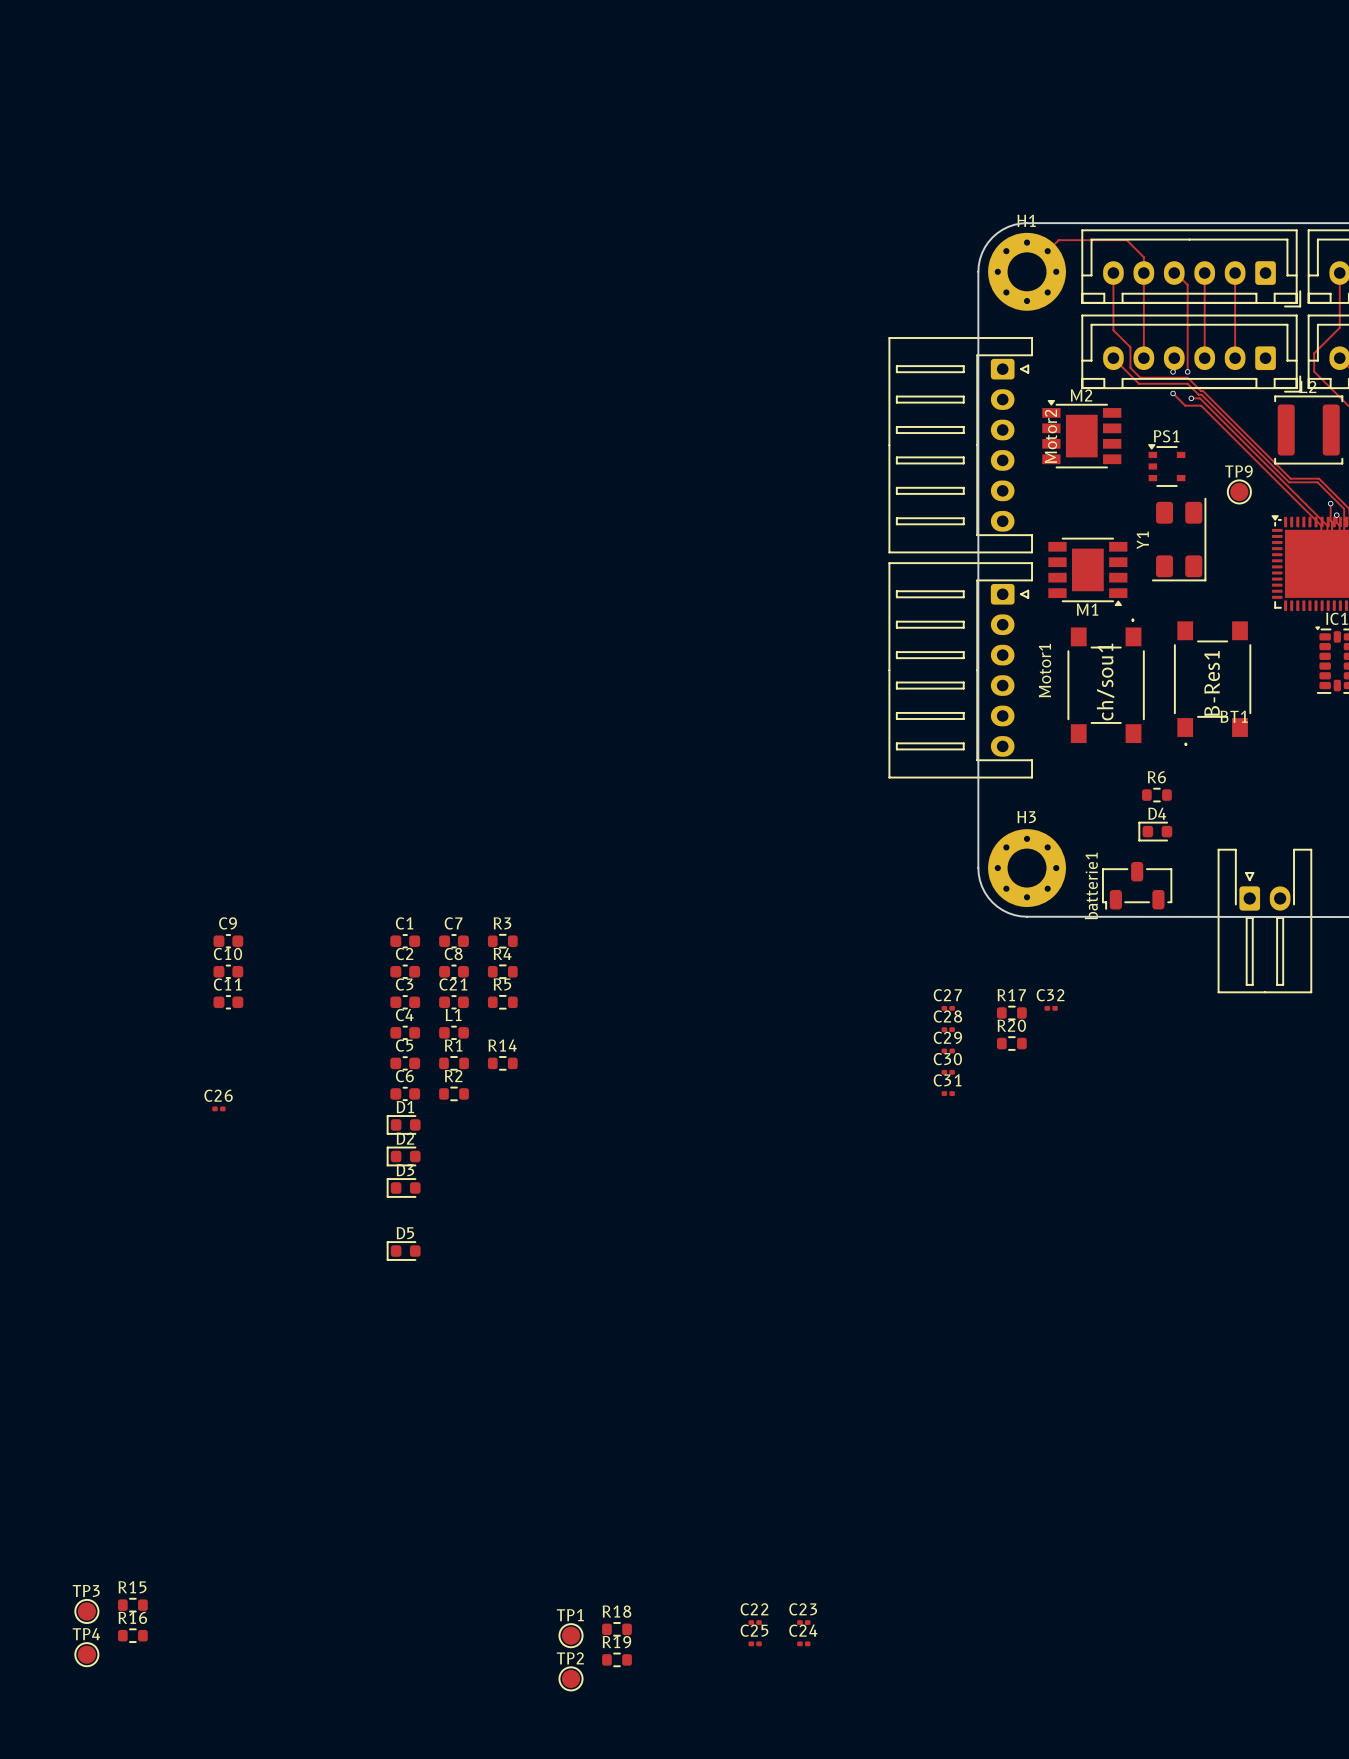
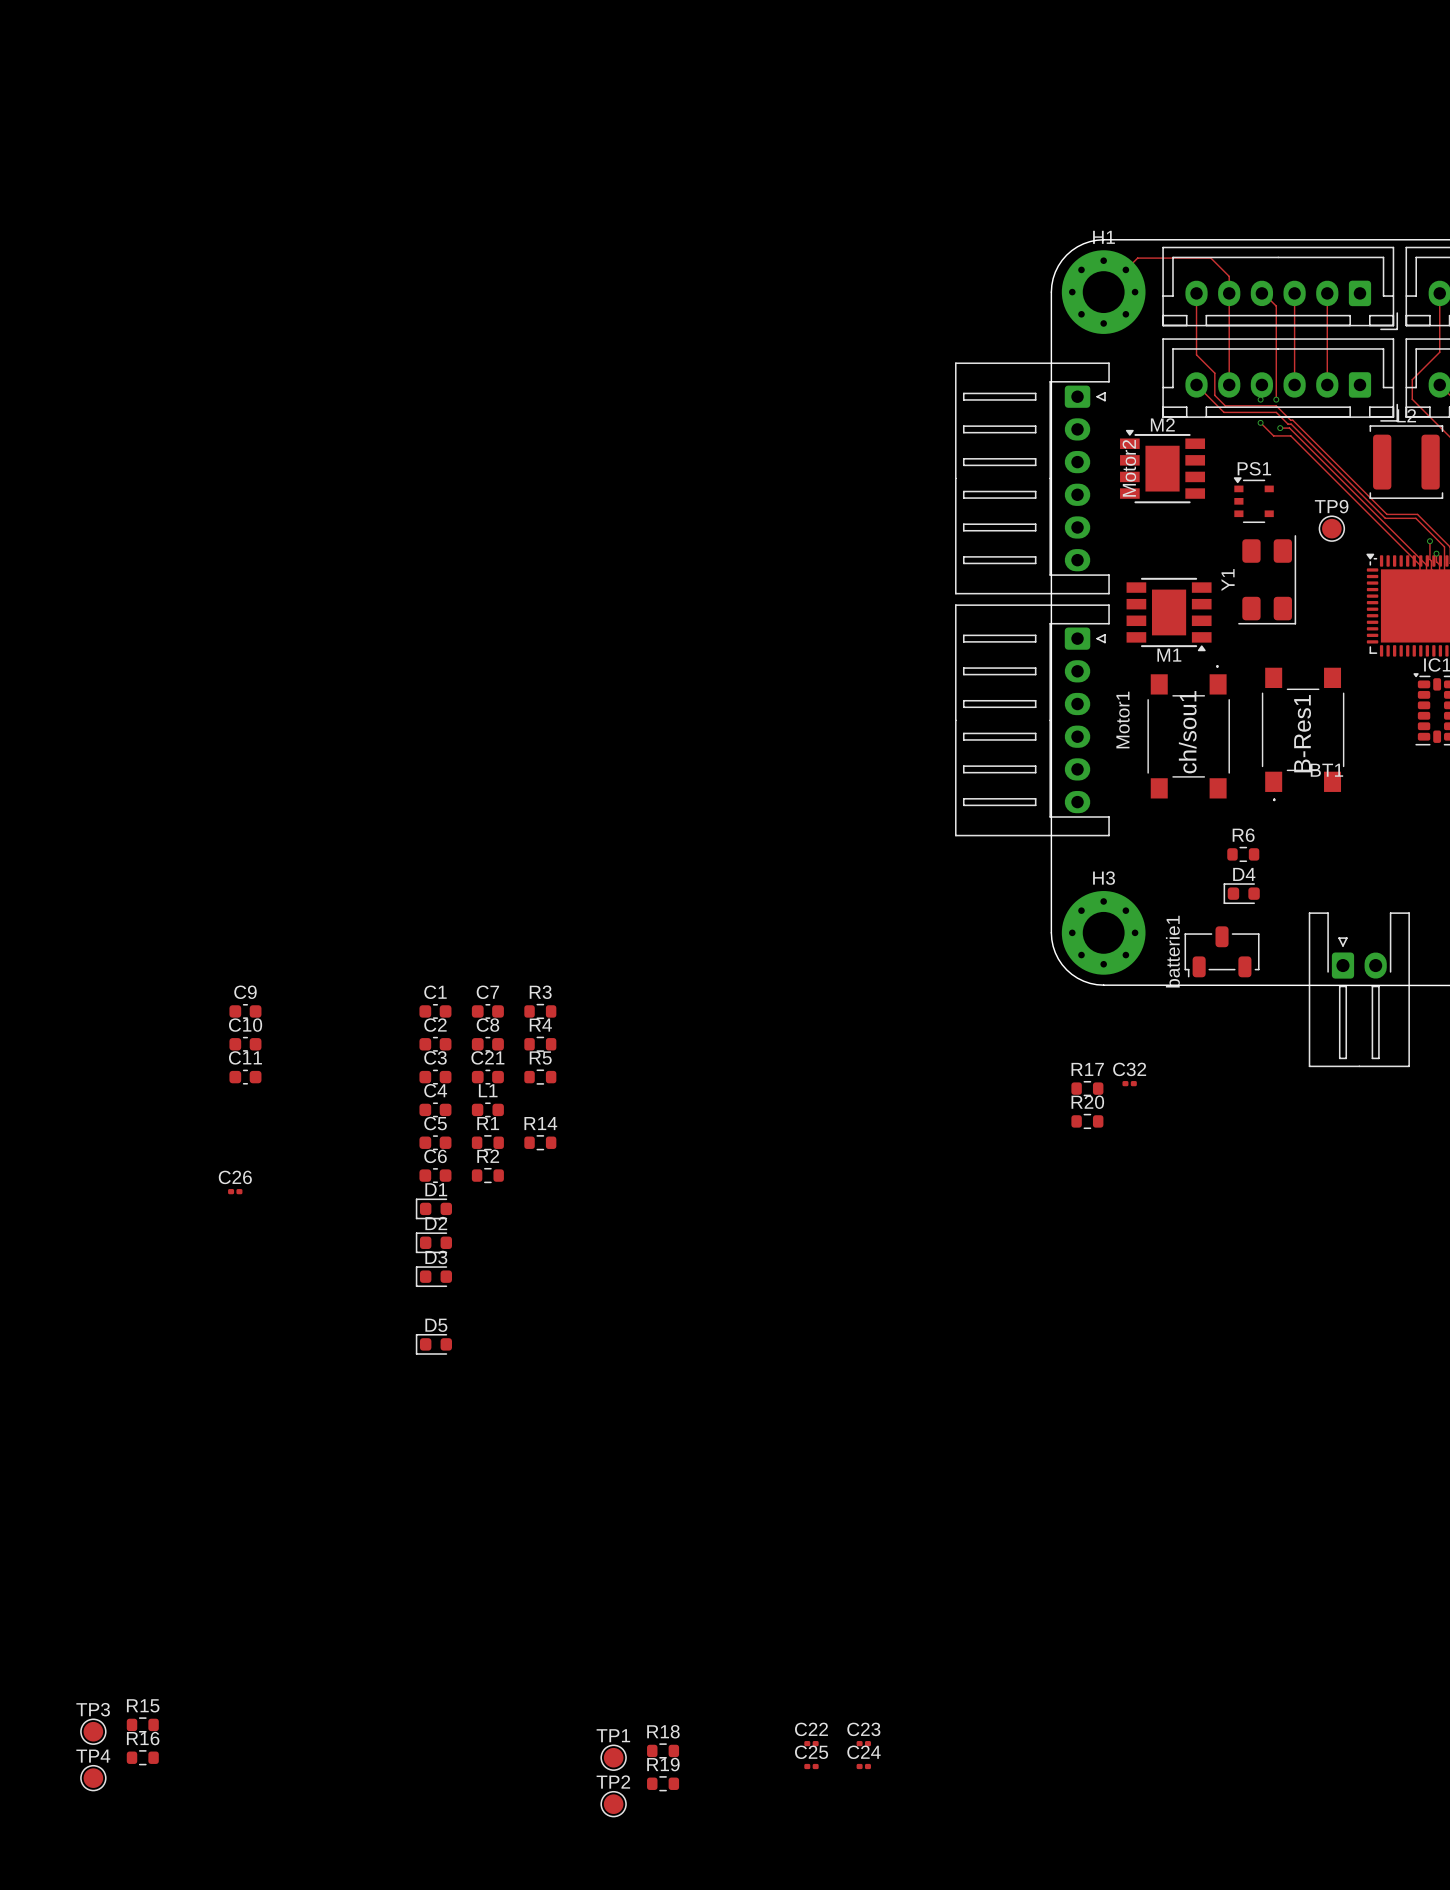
C27: (948, 1008) -> none
C28: (948, 1029) -> none
C29: (948, 1050) -> none
C30: (948, 1072) -> none
C31: (948, 1093) -> none

